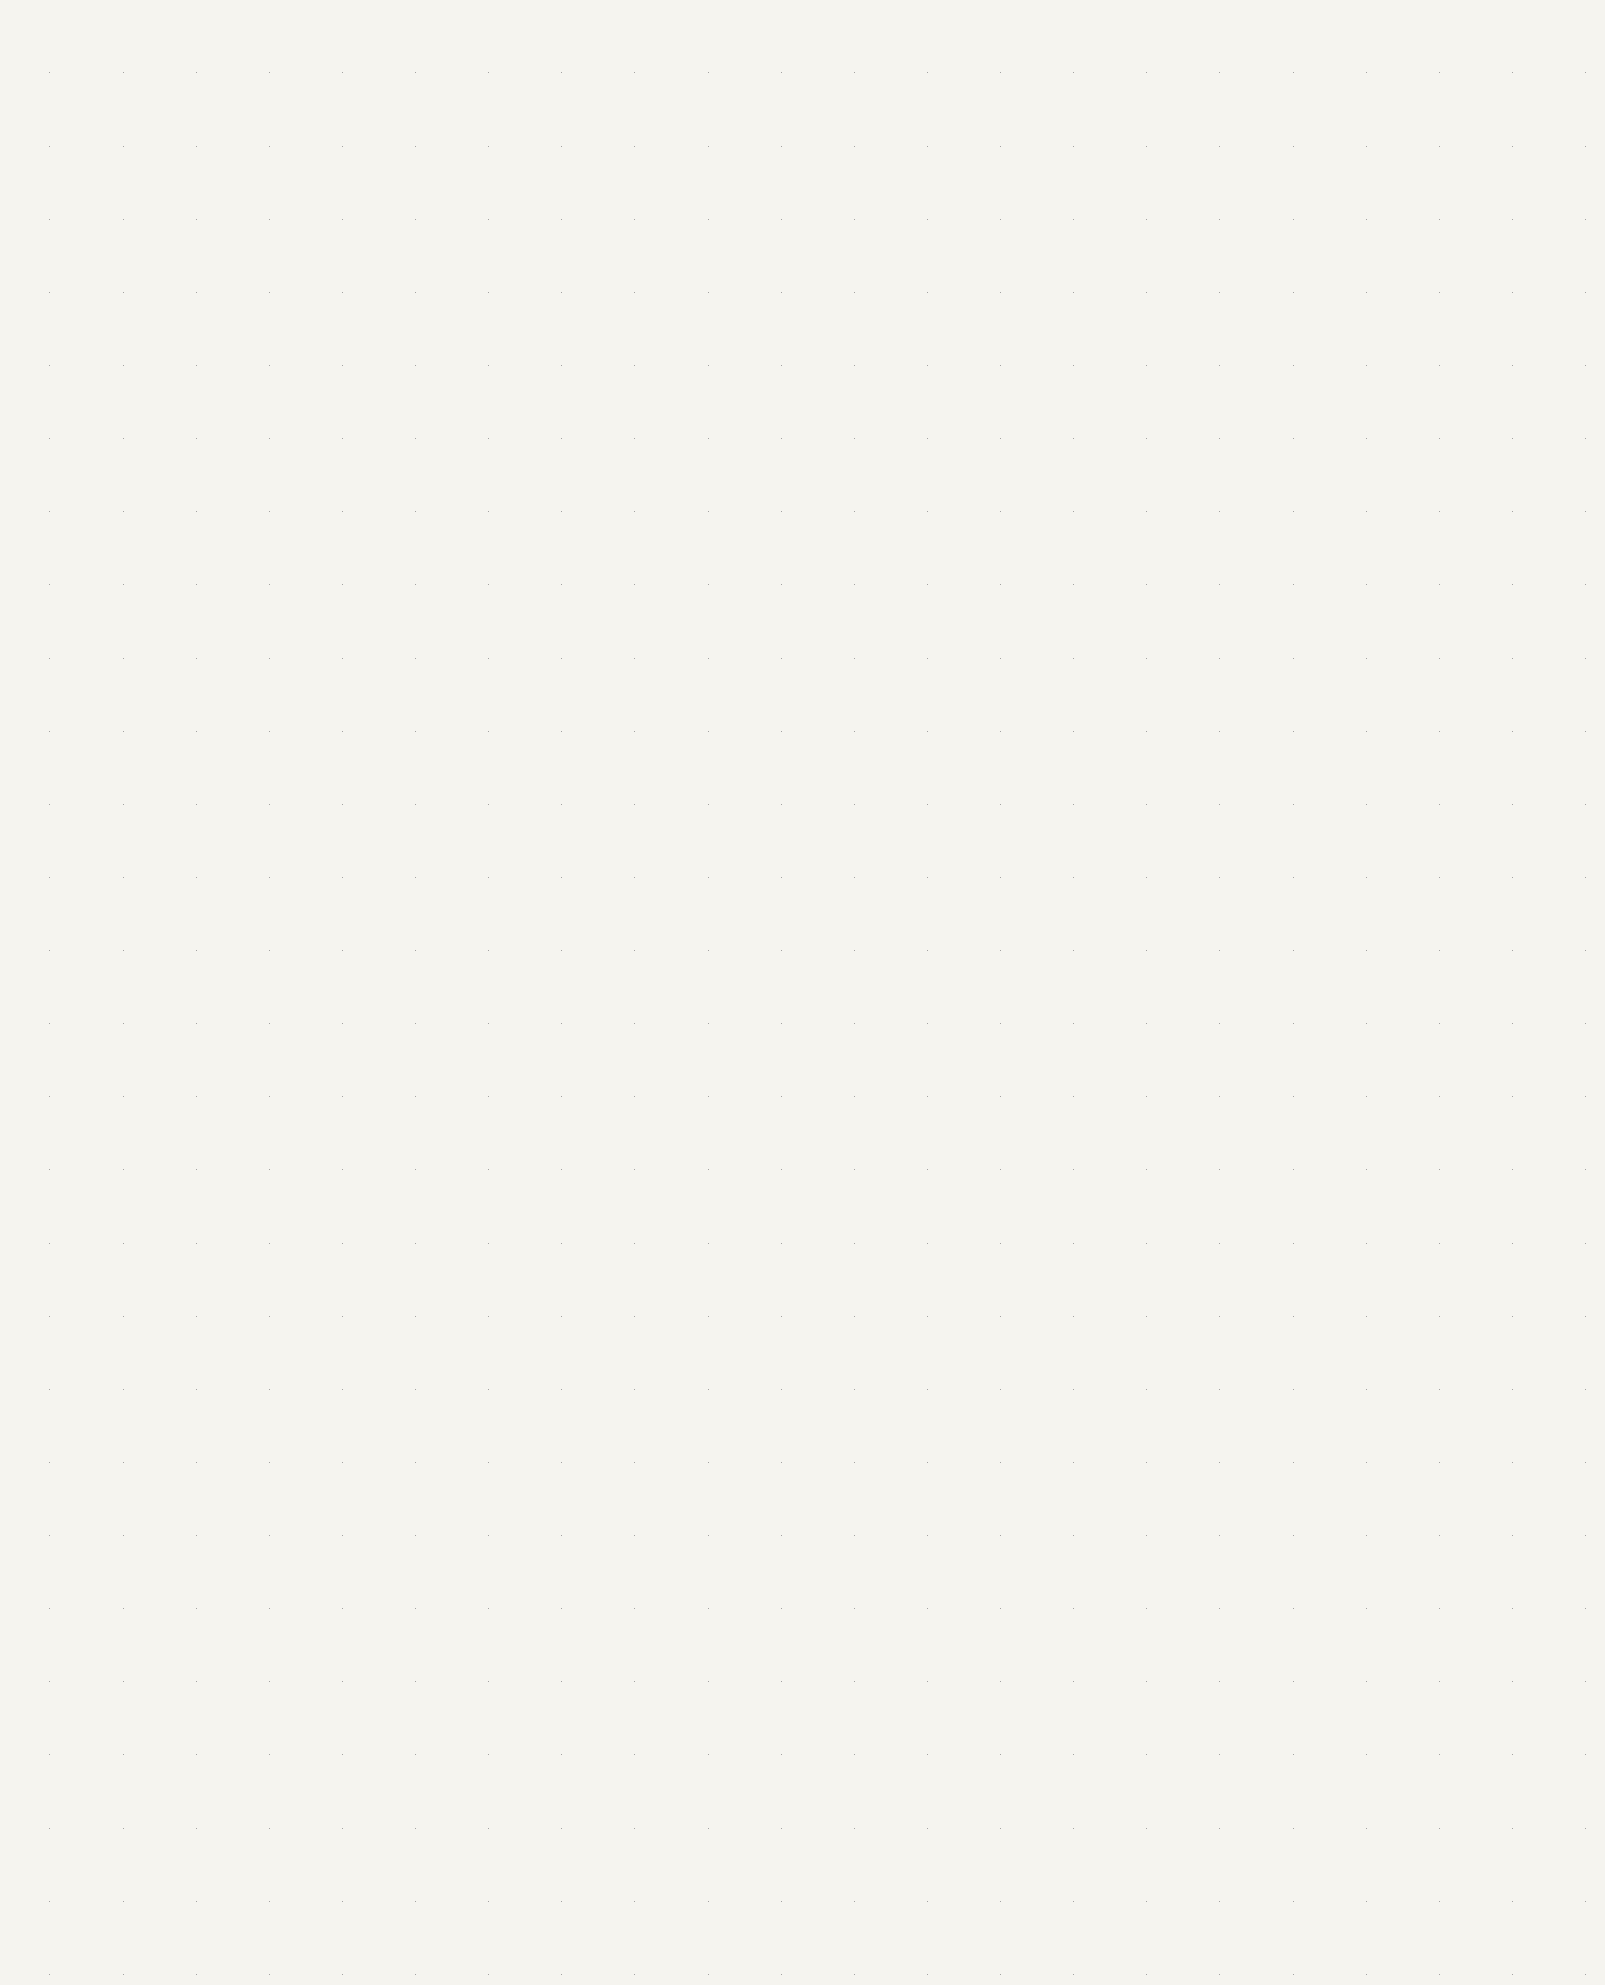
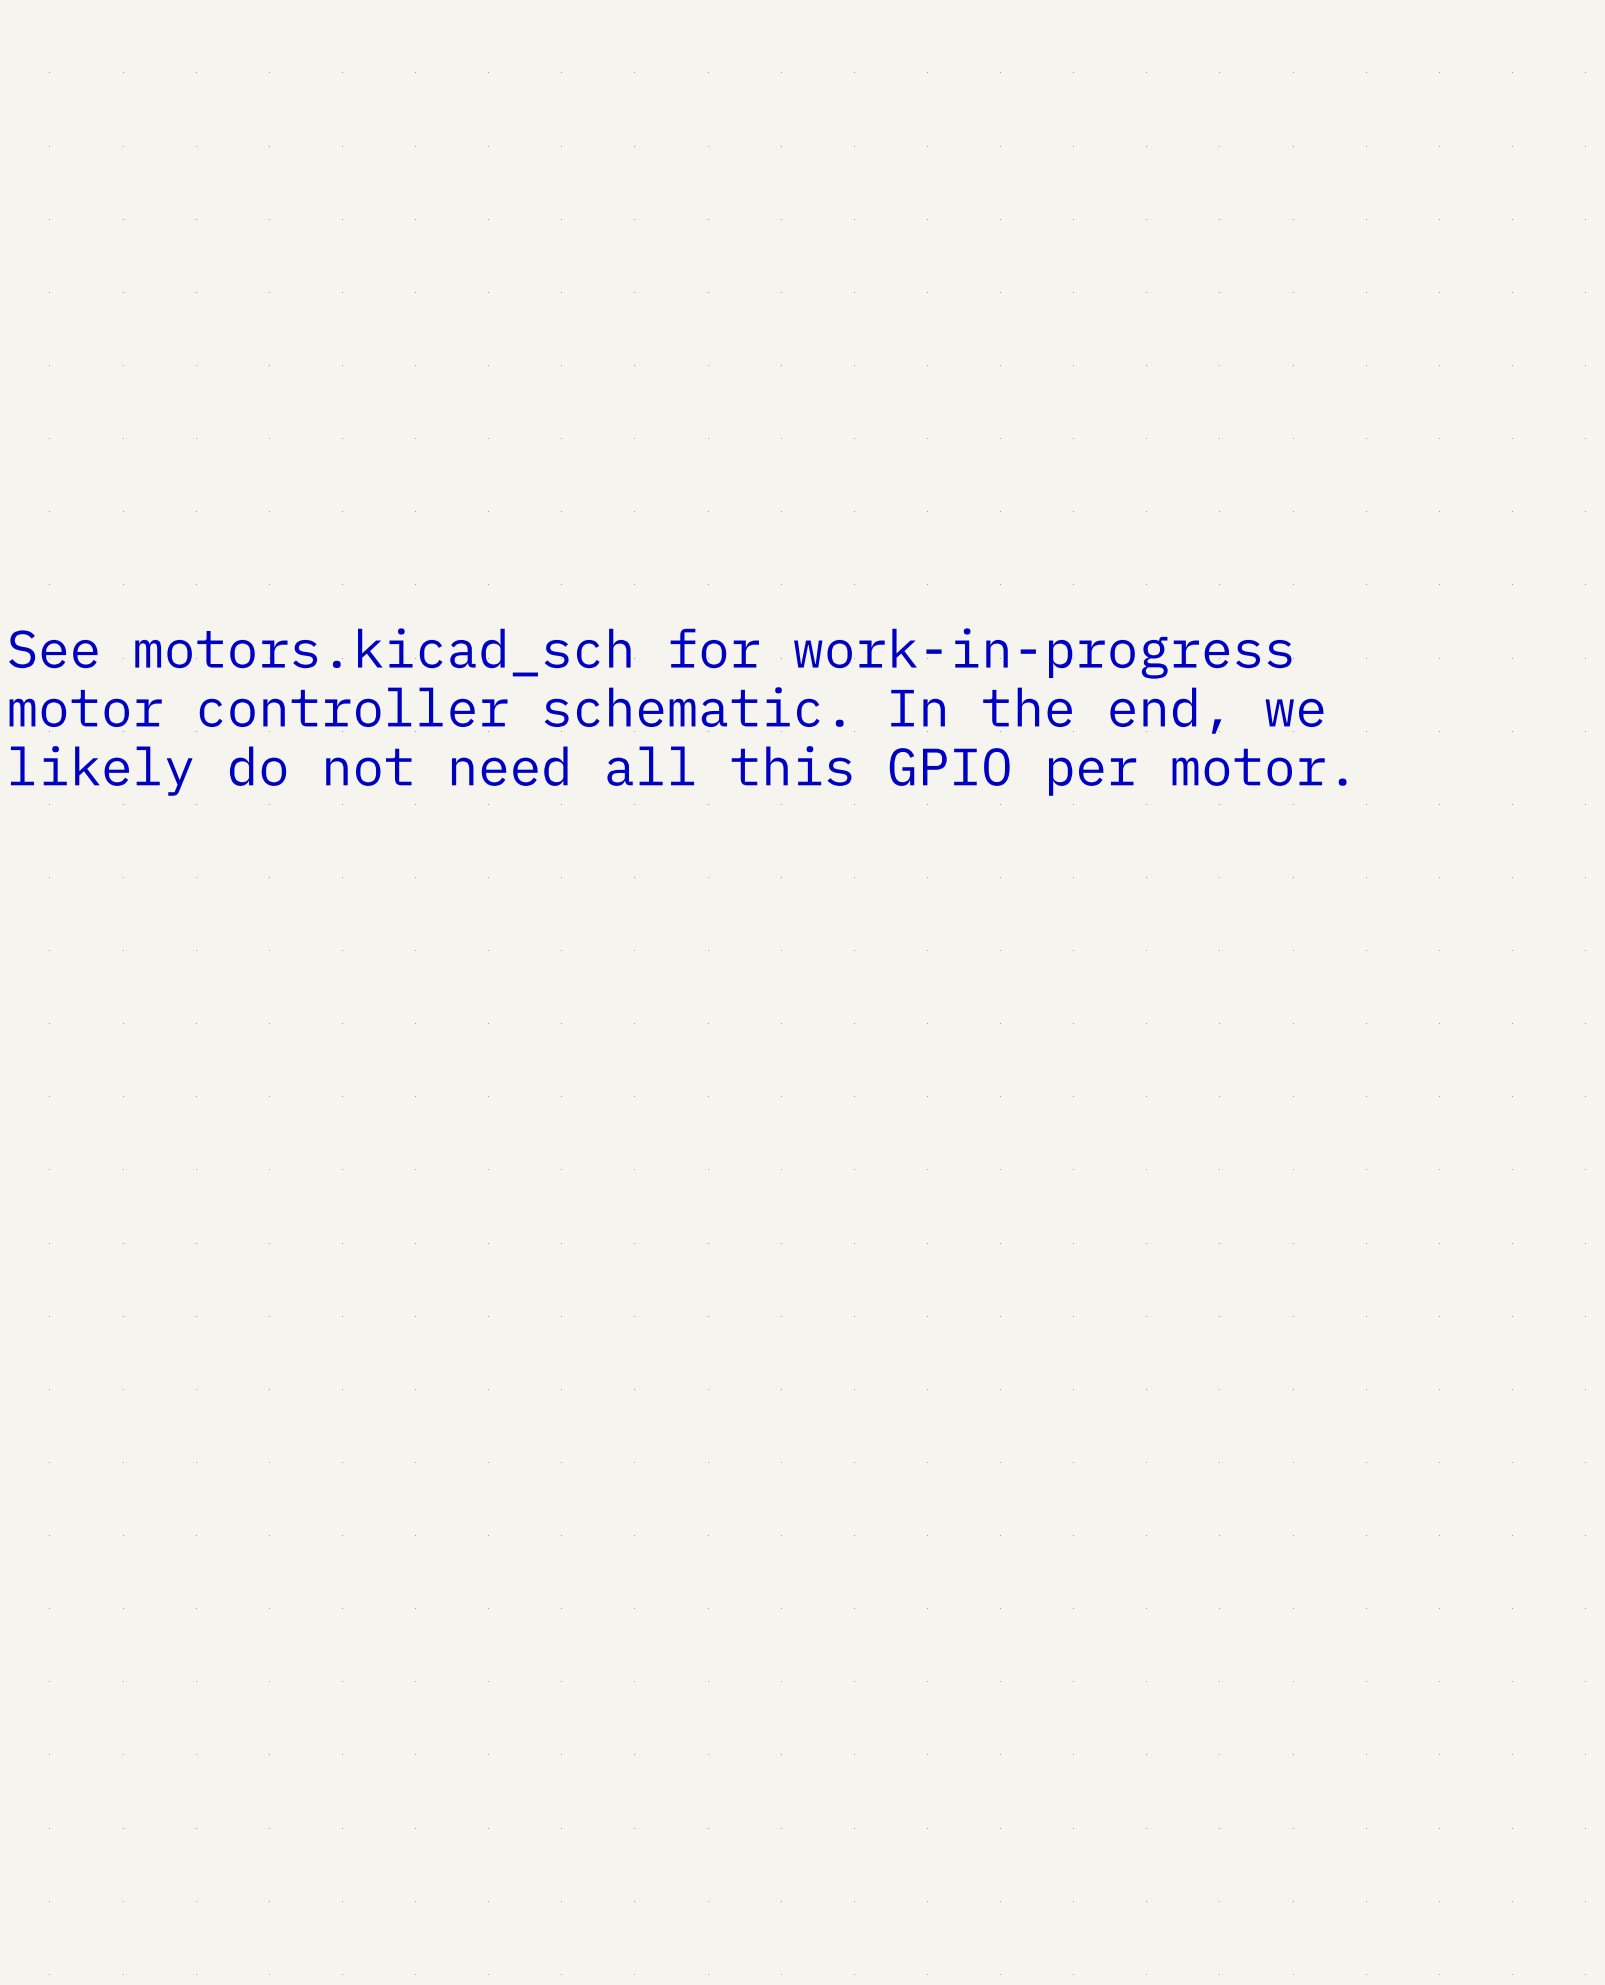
text: none -> See motors.kicad_sch for work-in-progress (650, 653)
text: none -> motor controller schematic. In the end, we (666, 710)
text: none -> likely do not need all this GPIO per motor. (678, 770)

